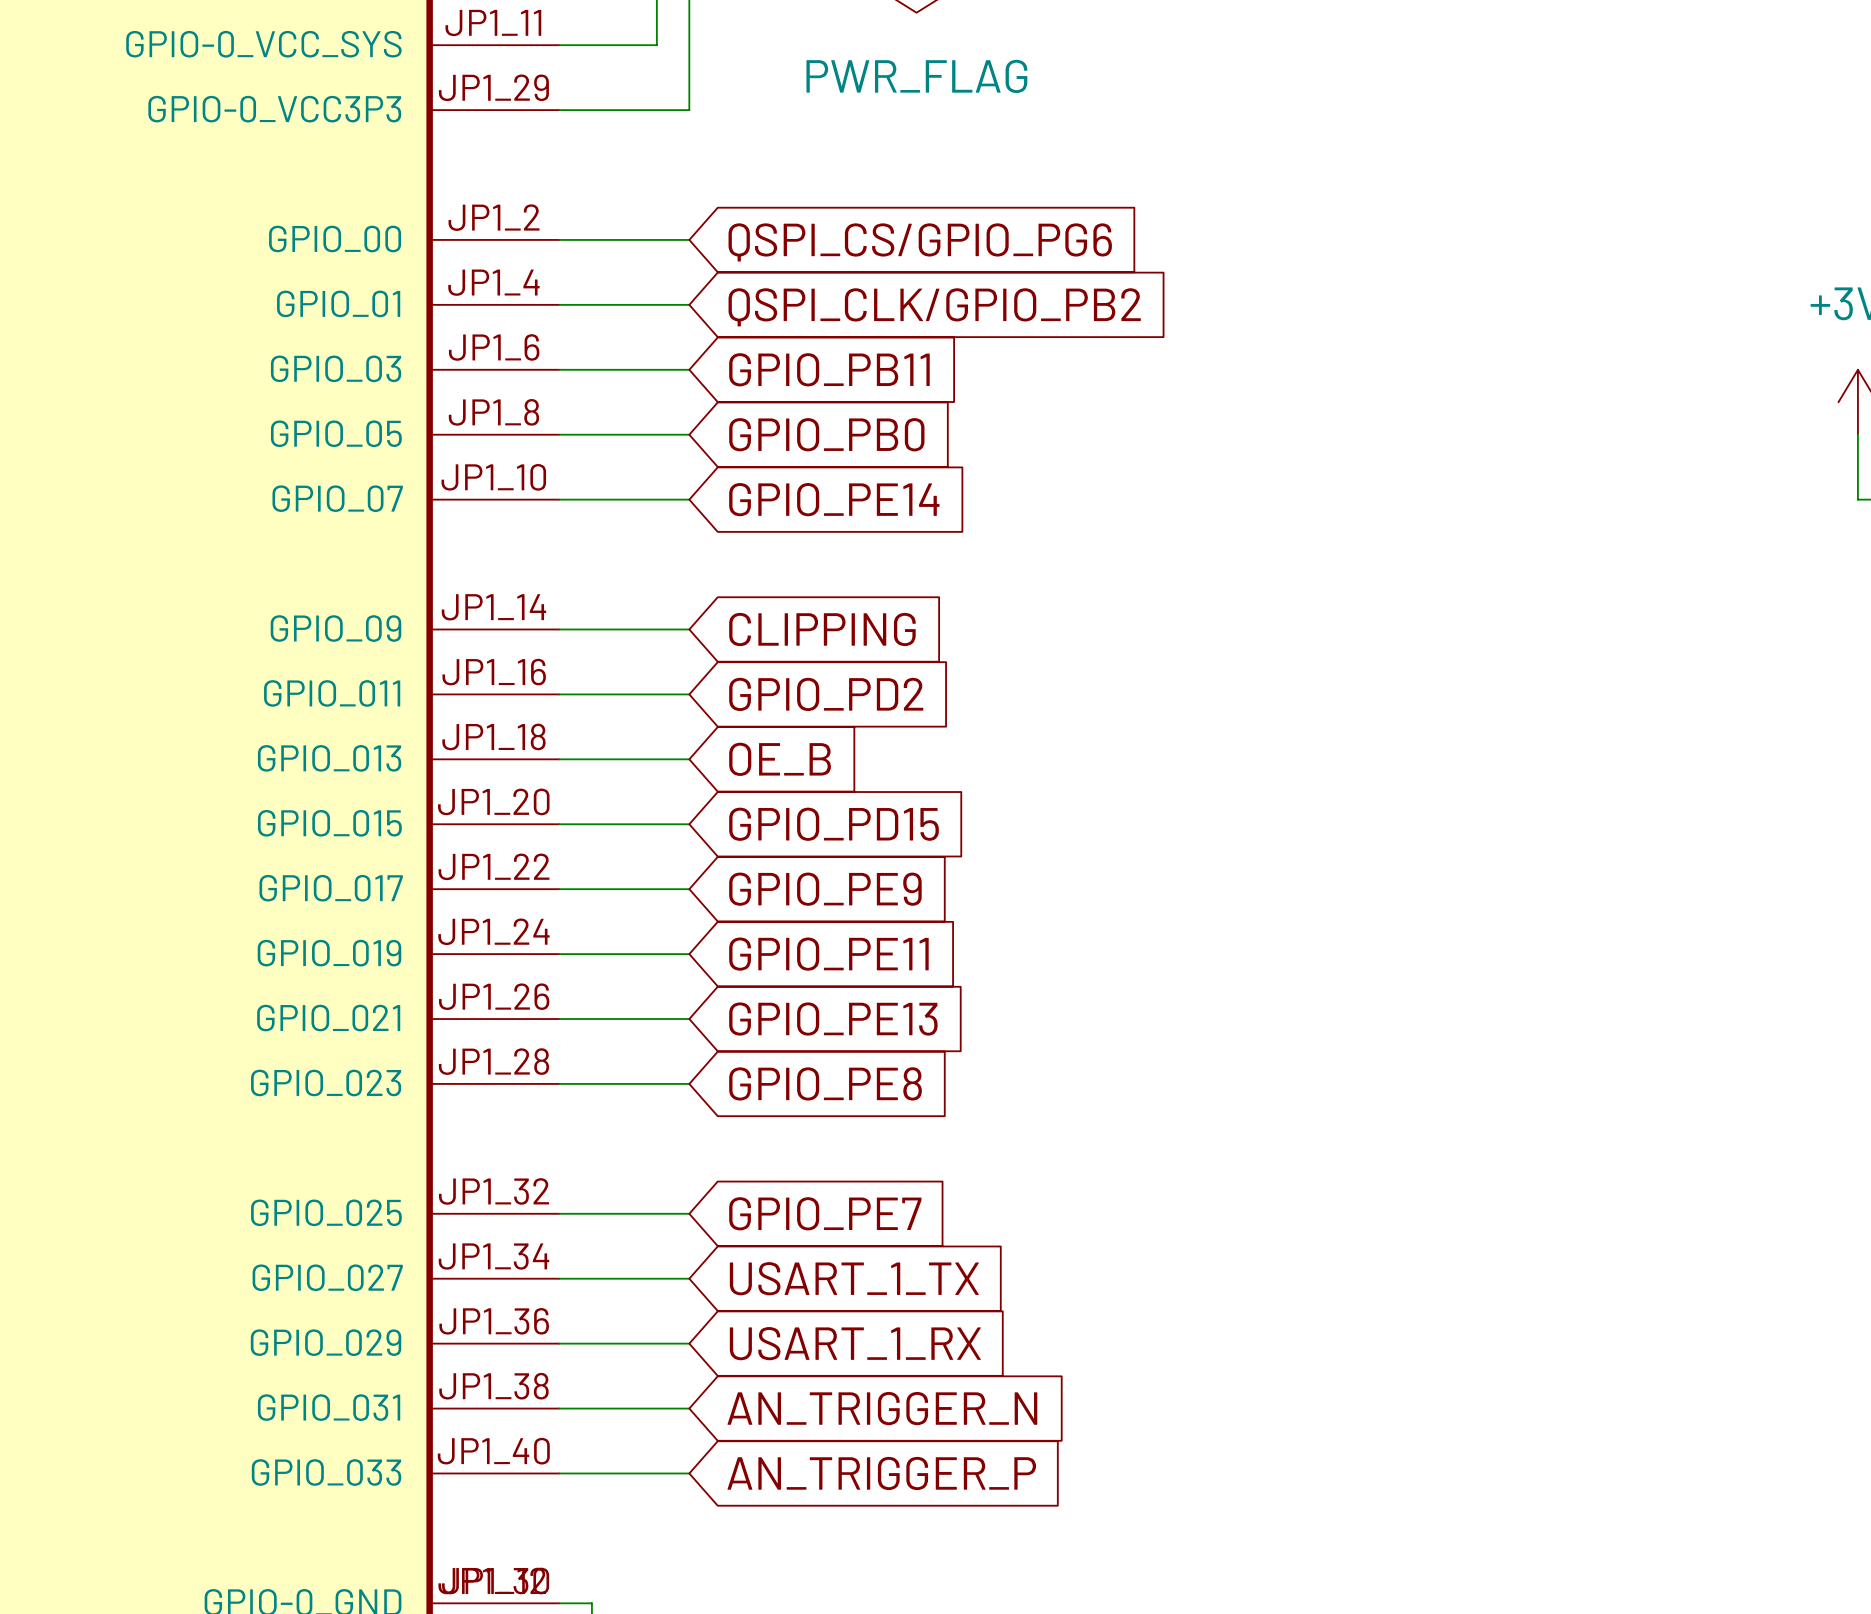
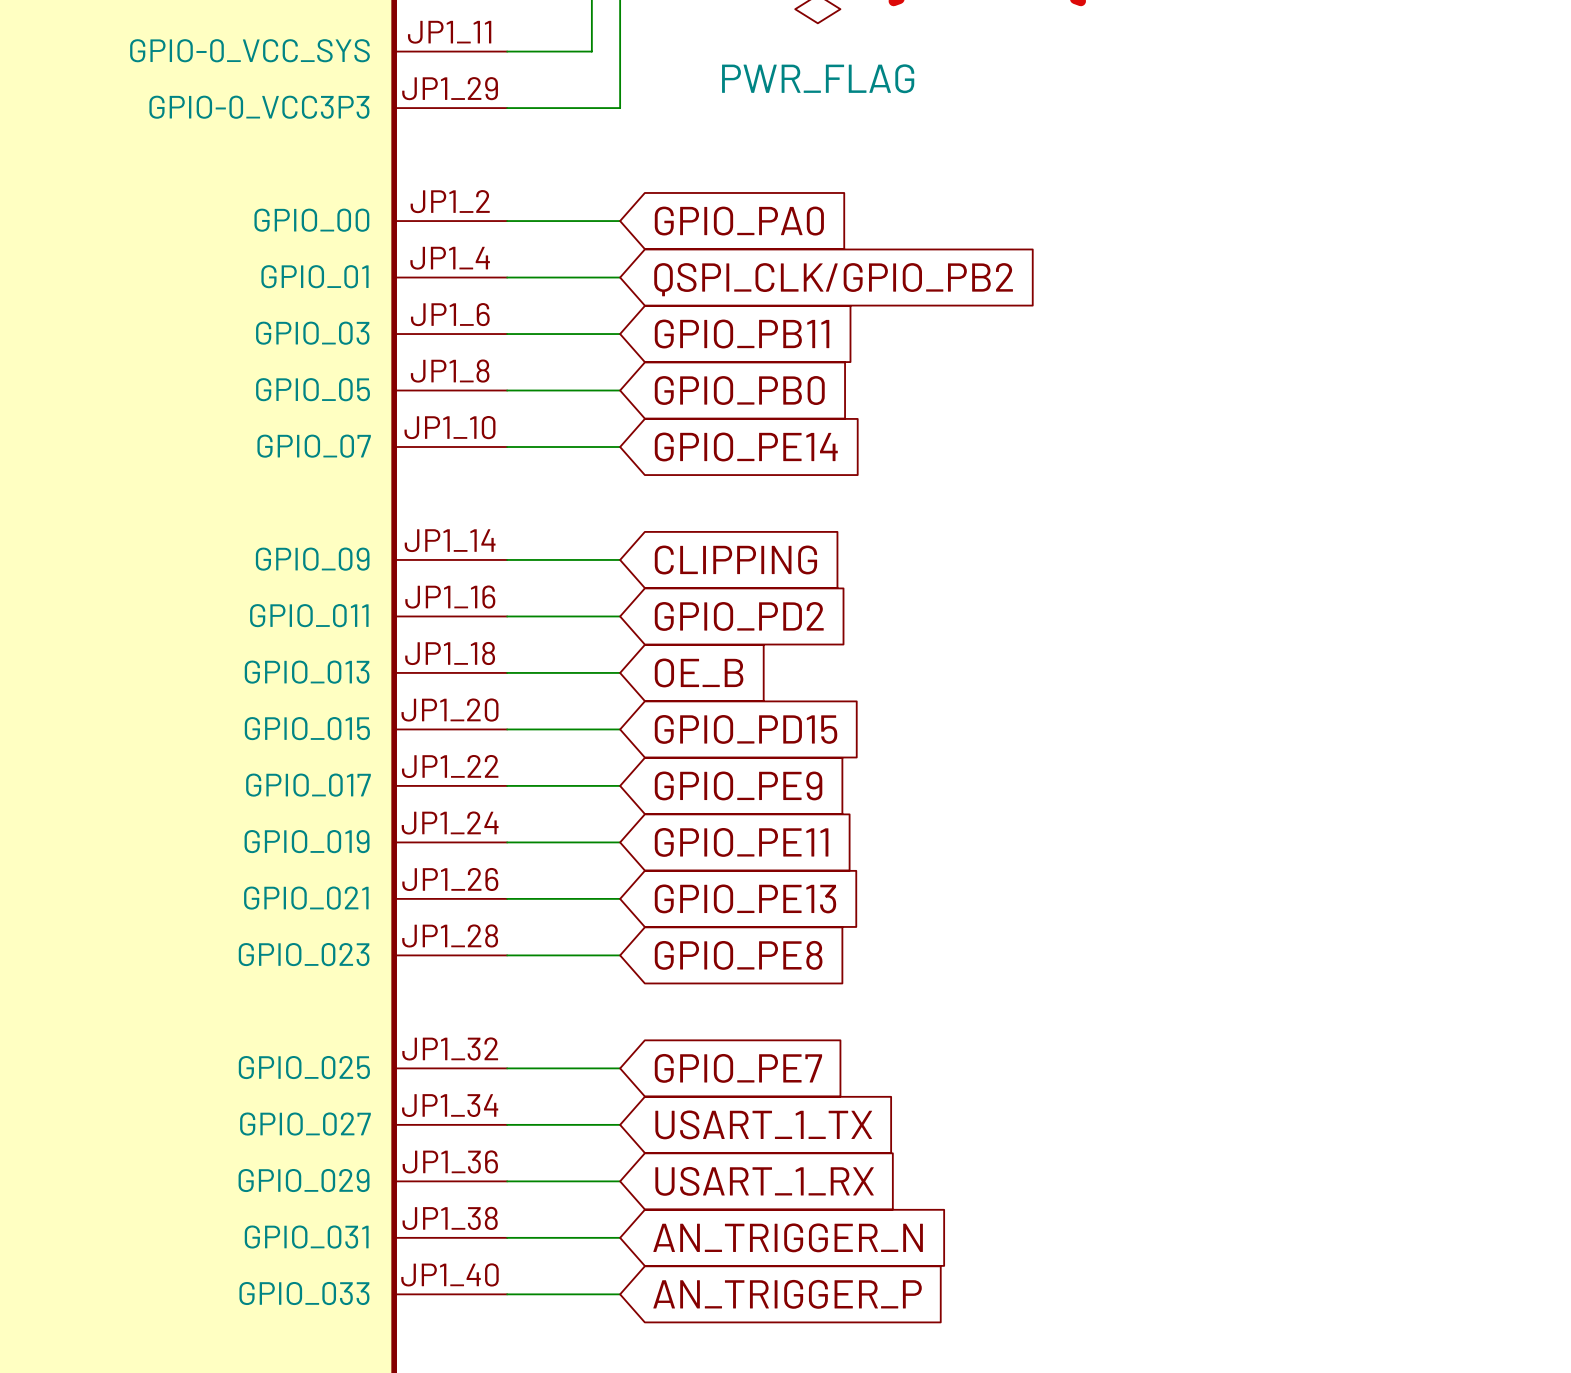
global label: QSPI_CS/GPIO_PG6 (920, 242) -> GPIO_PA0 (739, 221)

